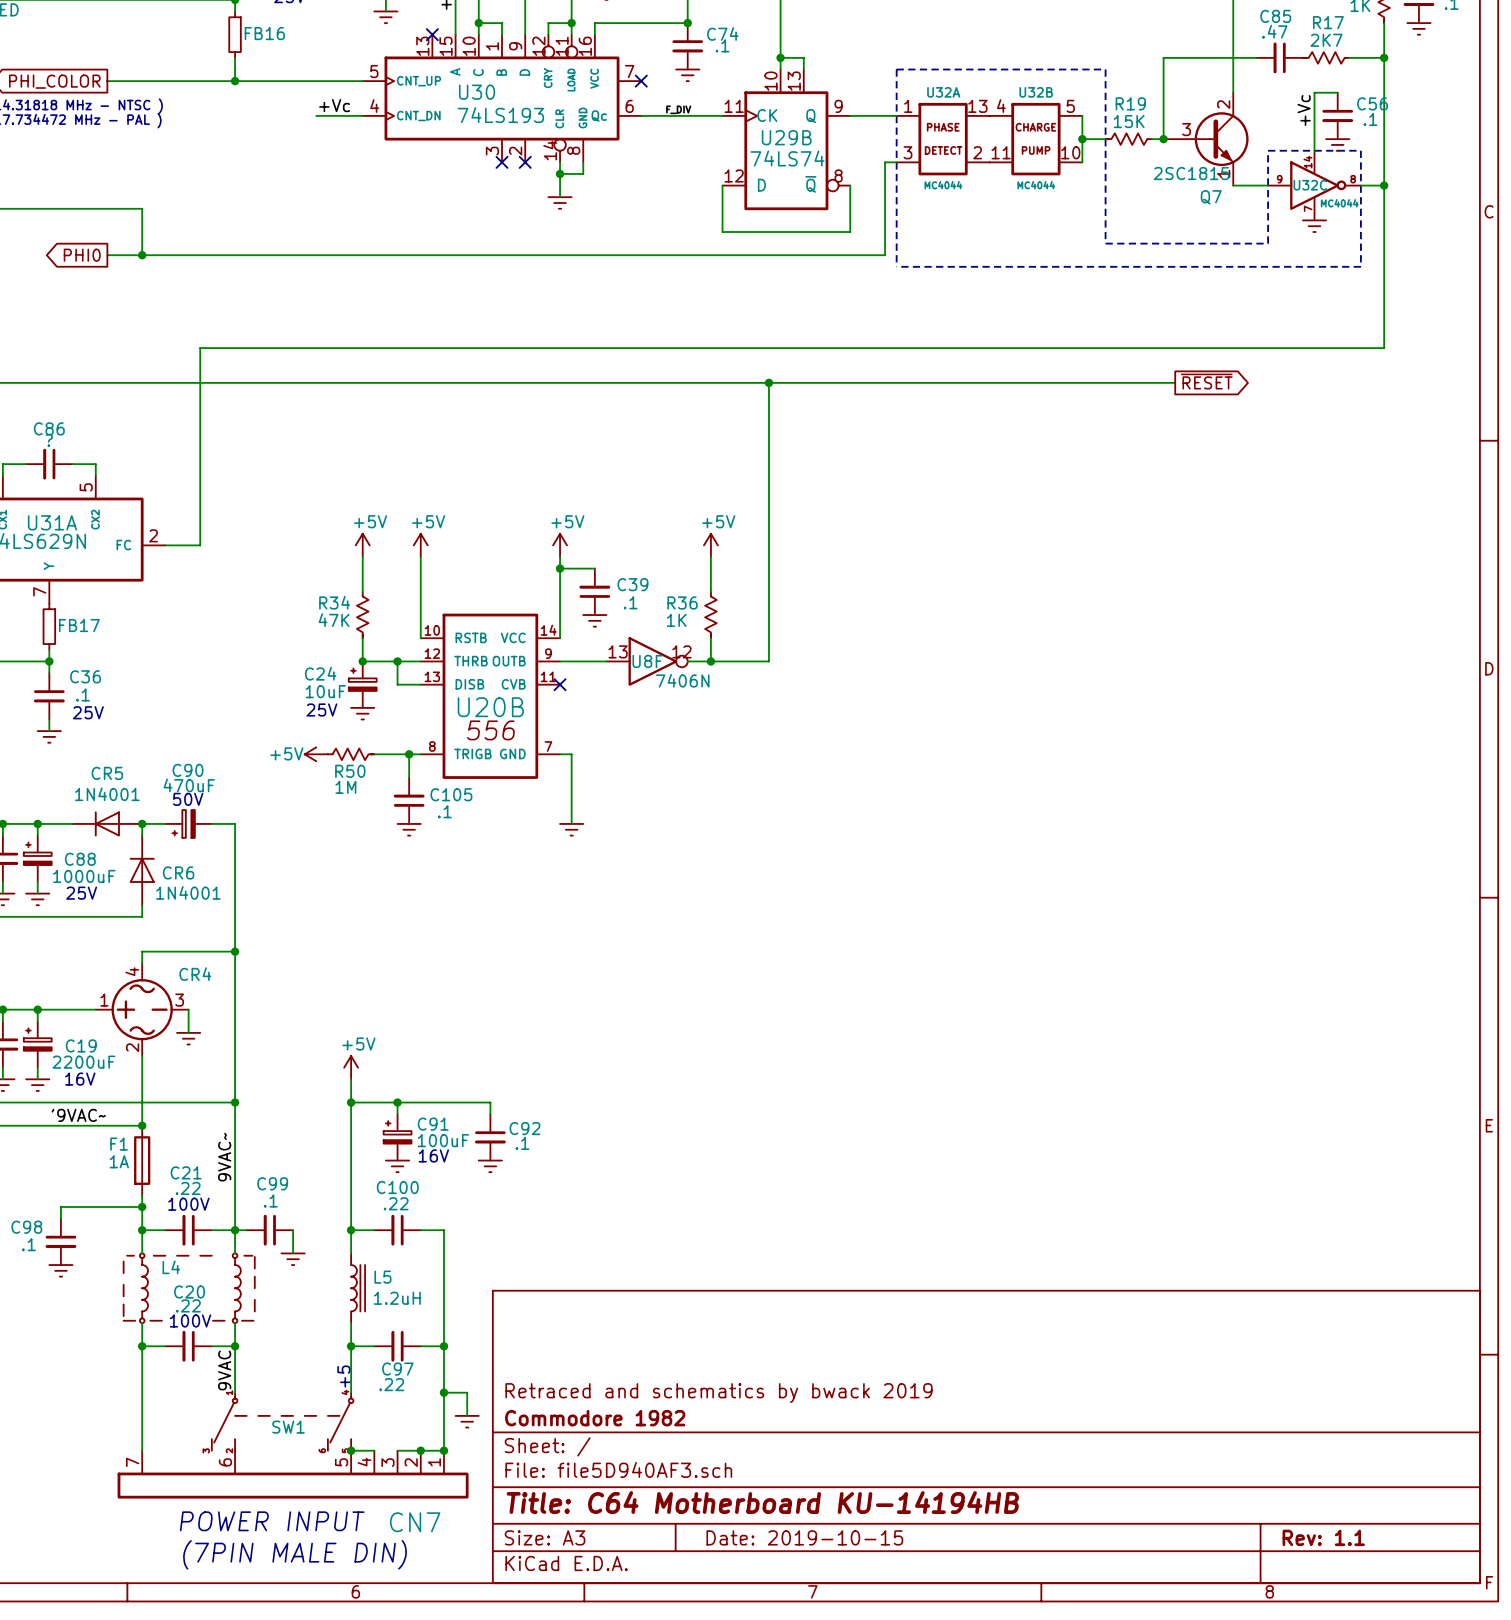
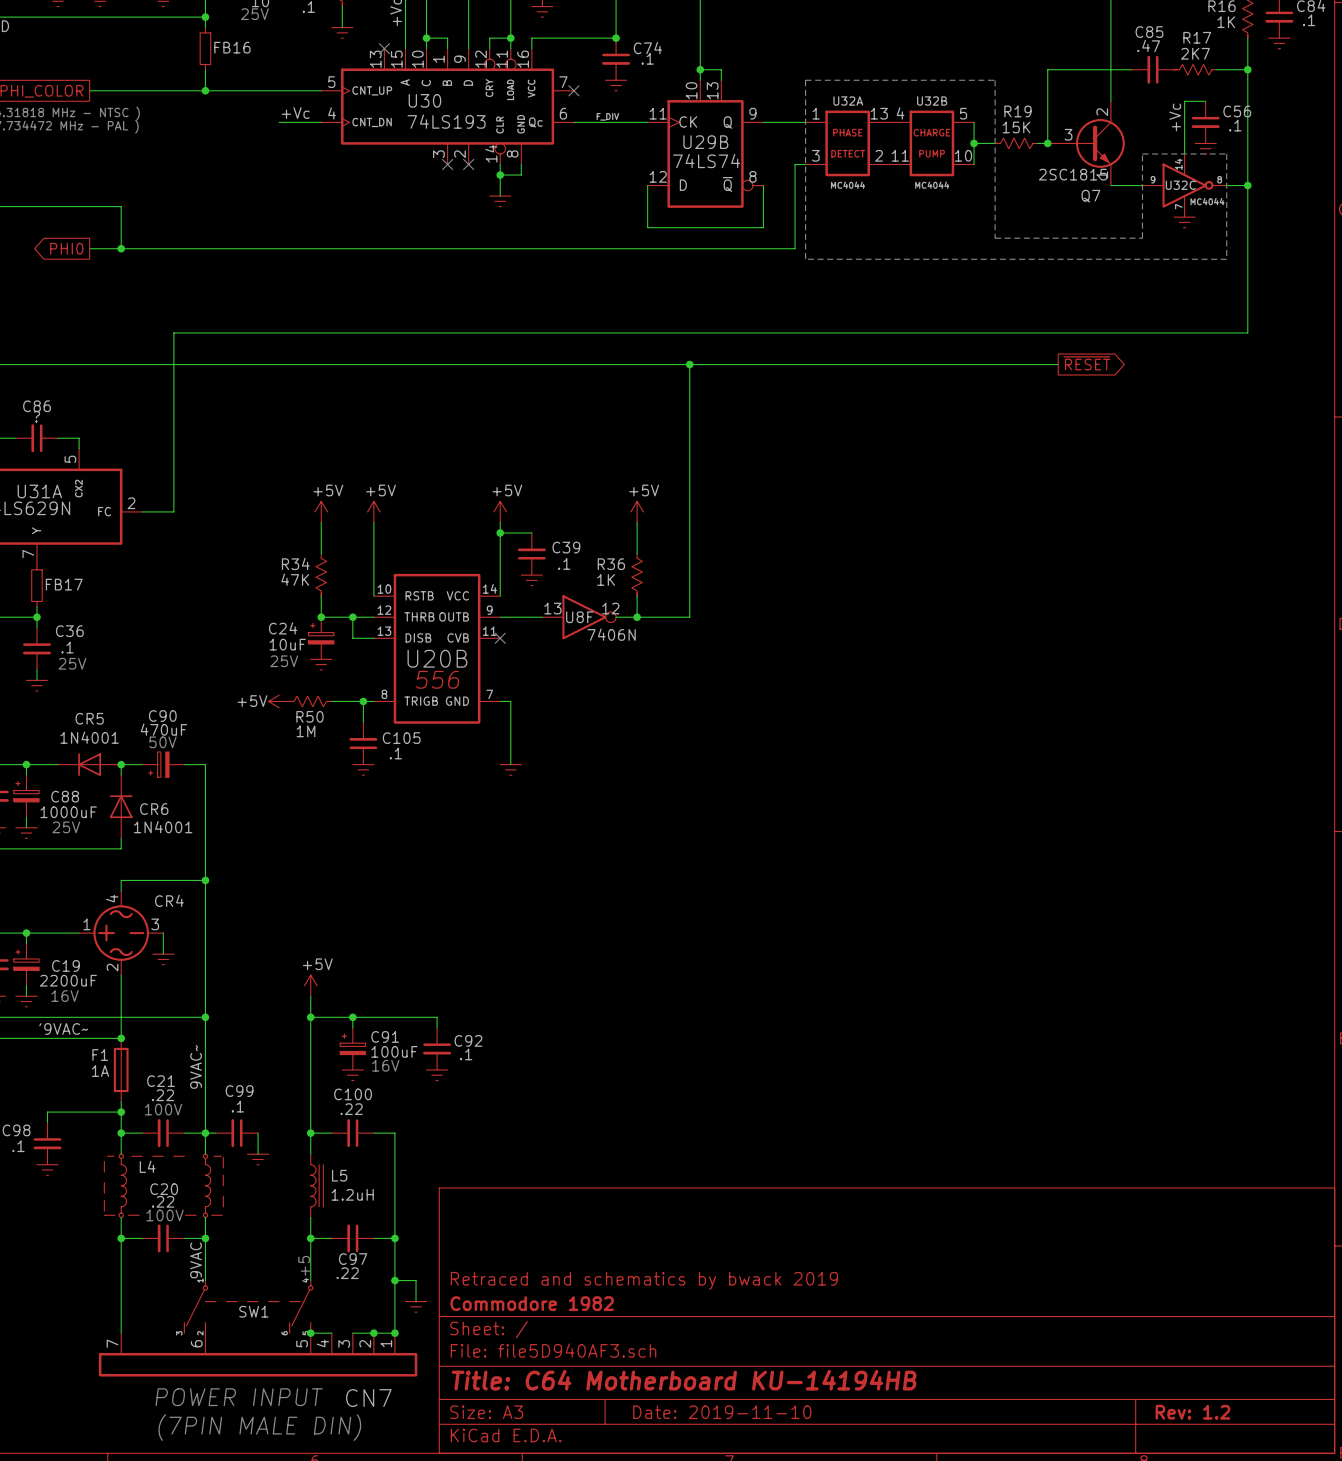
title block: Date: 2019-10-15 (804, 1537) -> Date: 2019-11-10 (722, 1412)
title block: Rev: 1.1 (1323, 1537) -> Rev: 1.2 (1192, 1412)

